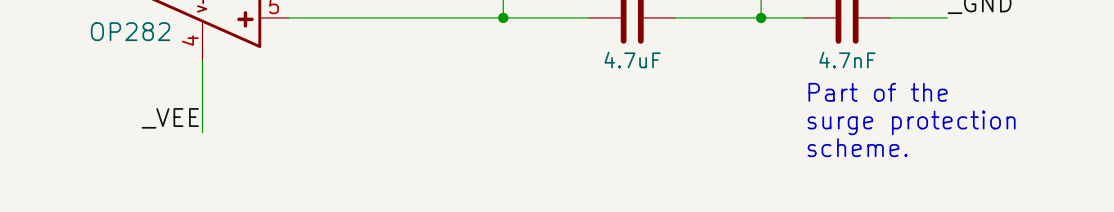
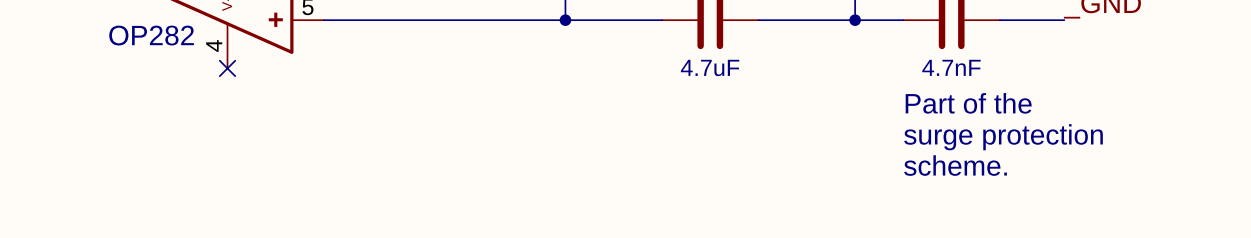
wire: (202, 60) (202, 132) -> none
no-connect mark: none -> (227, 68)
label: _VEE (170, 118) -> none

